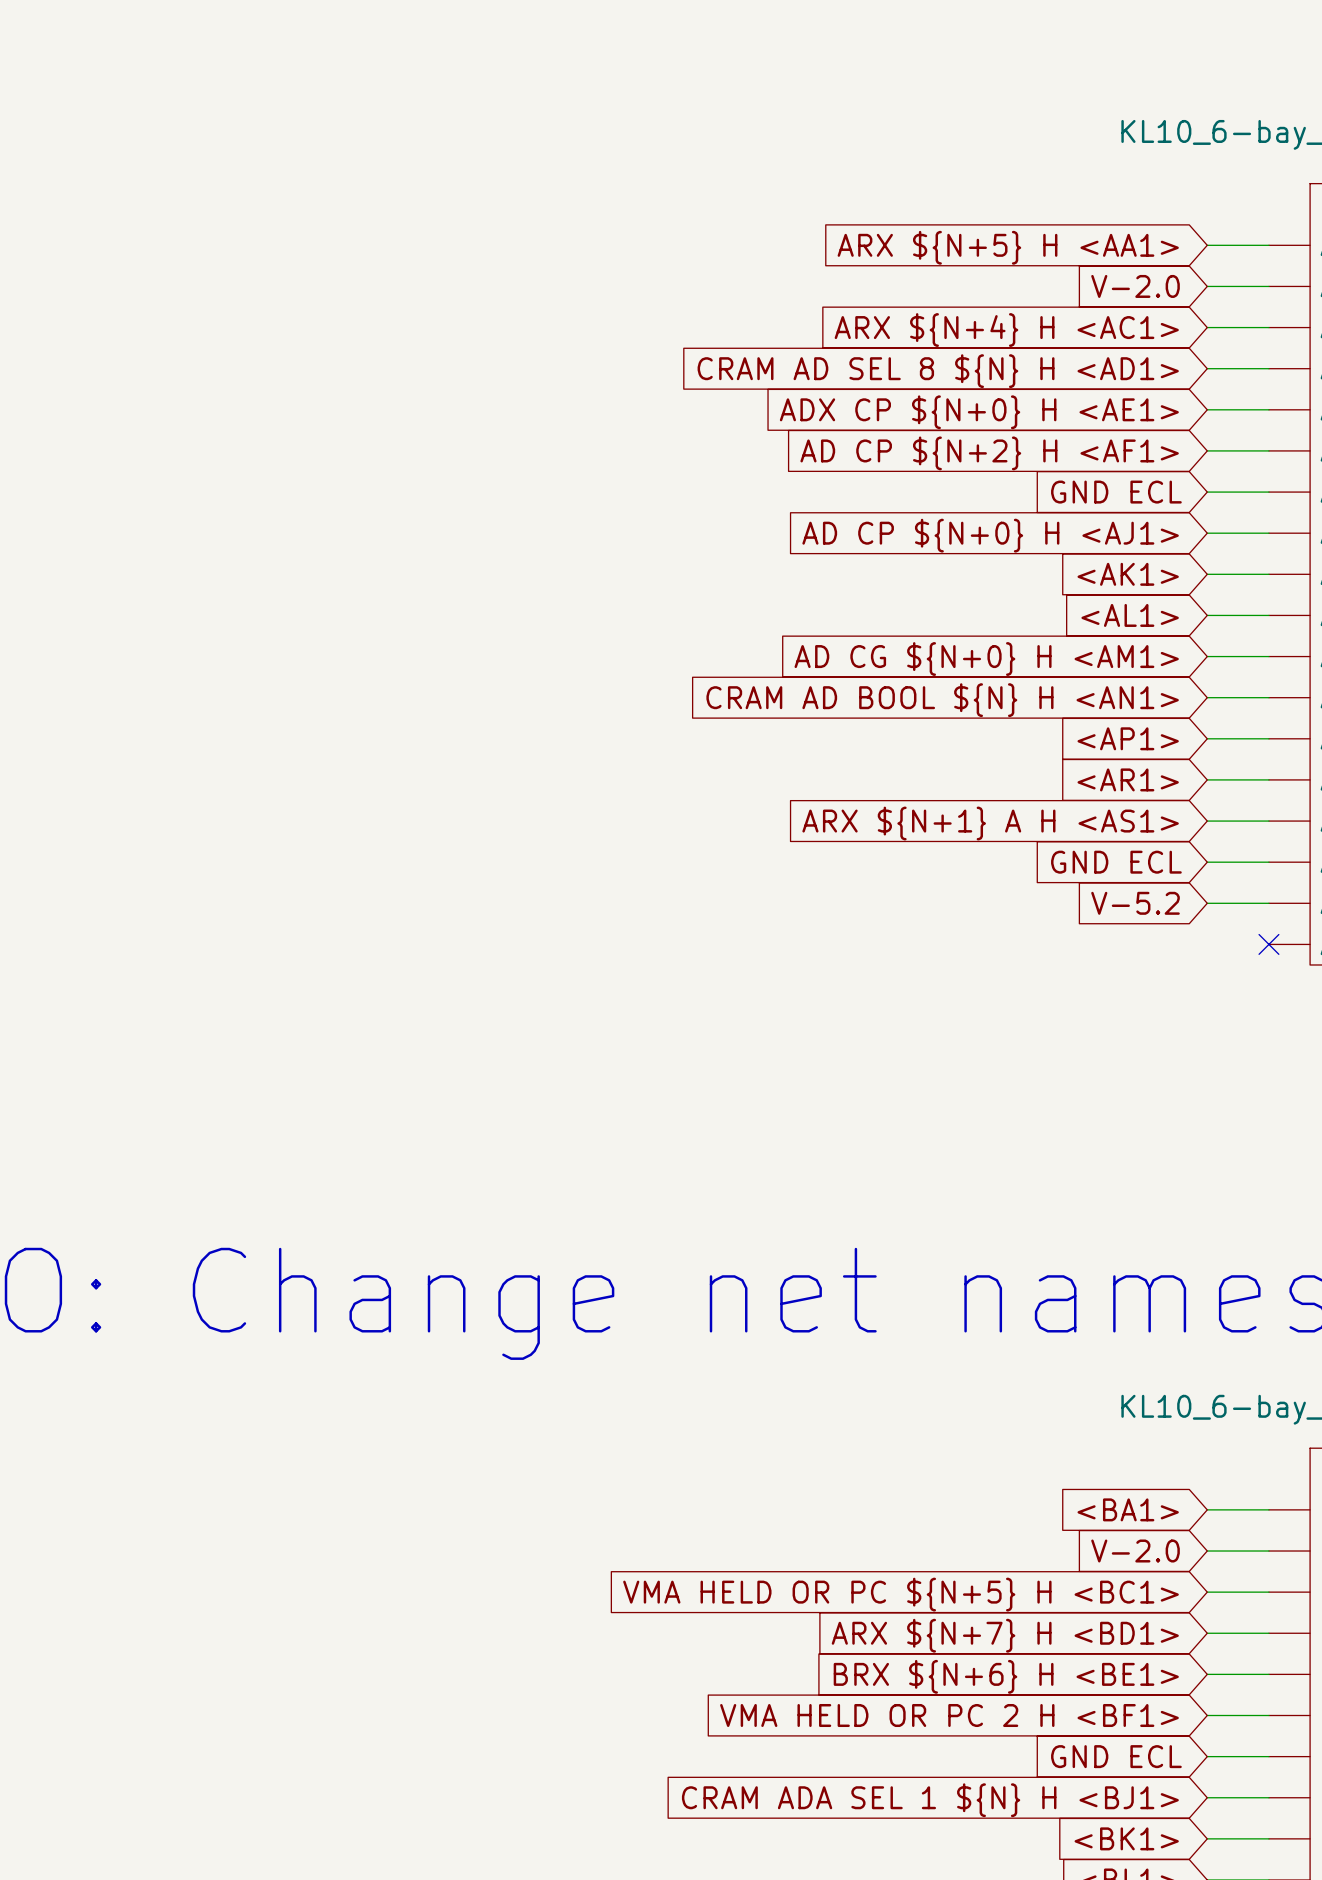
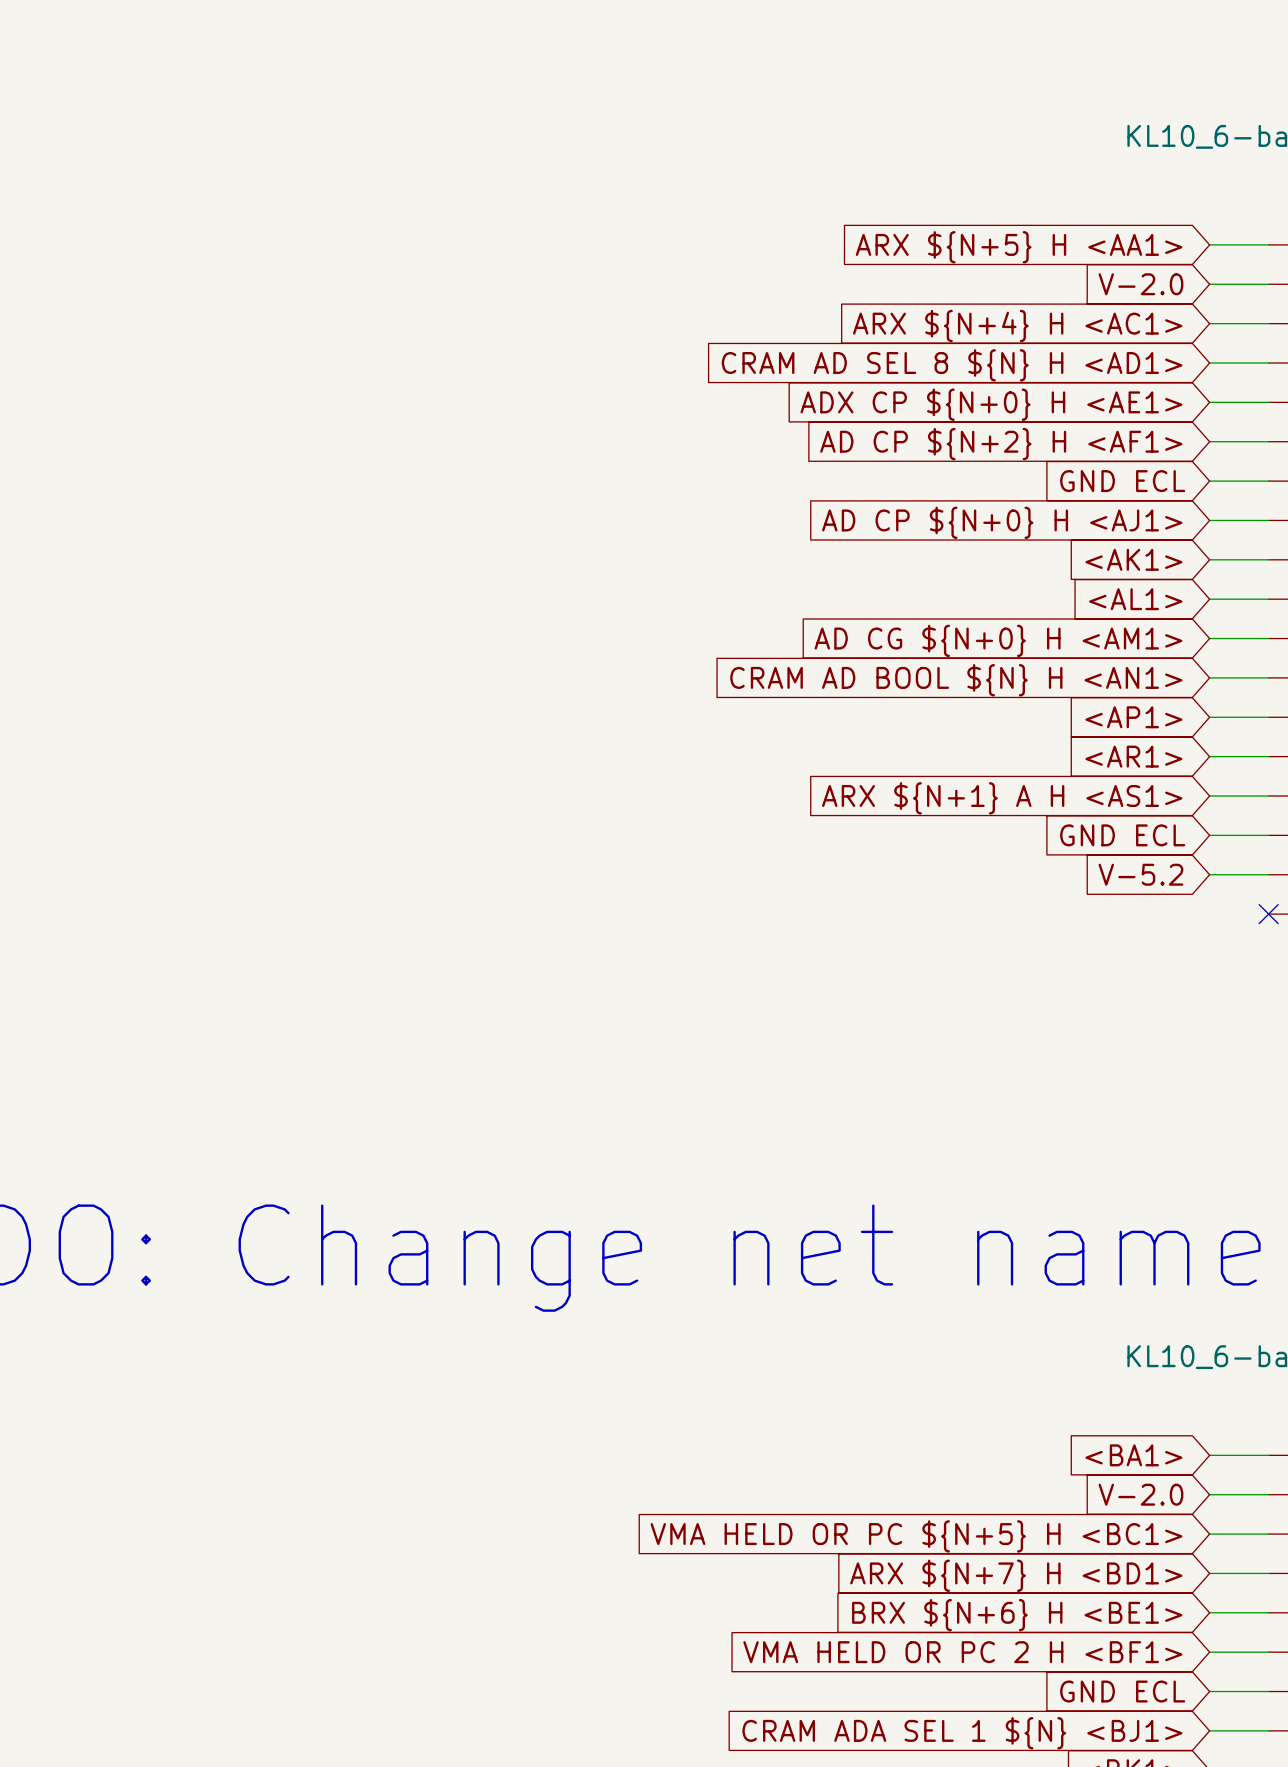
global label: CRAM ADA SEL 1 ${N} H <BJ1> (930, 1800) -> CRAM ADA SEL 1 ${N} <BJ1> (962, 1733)

